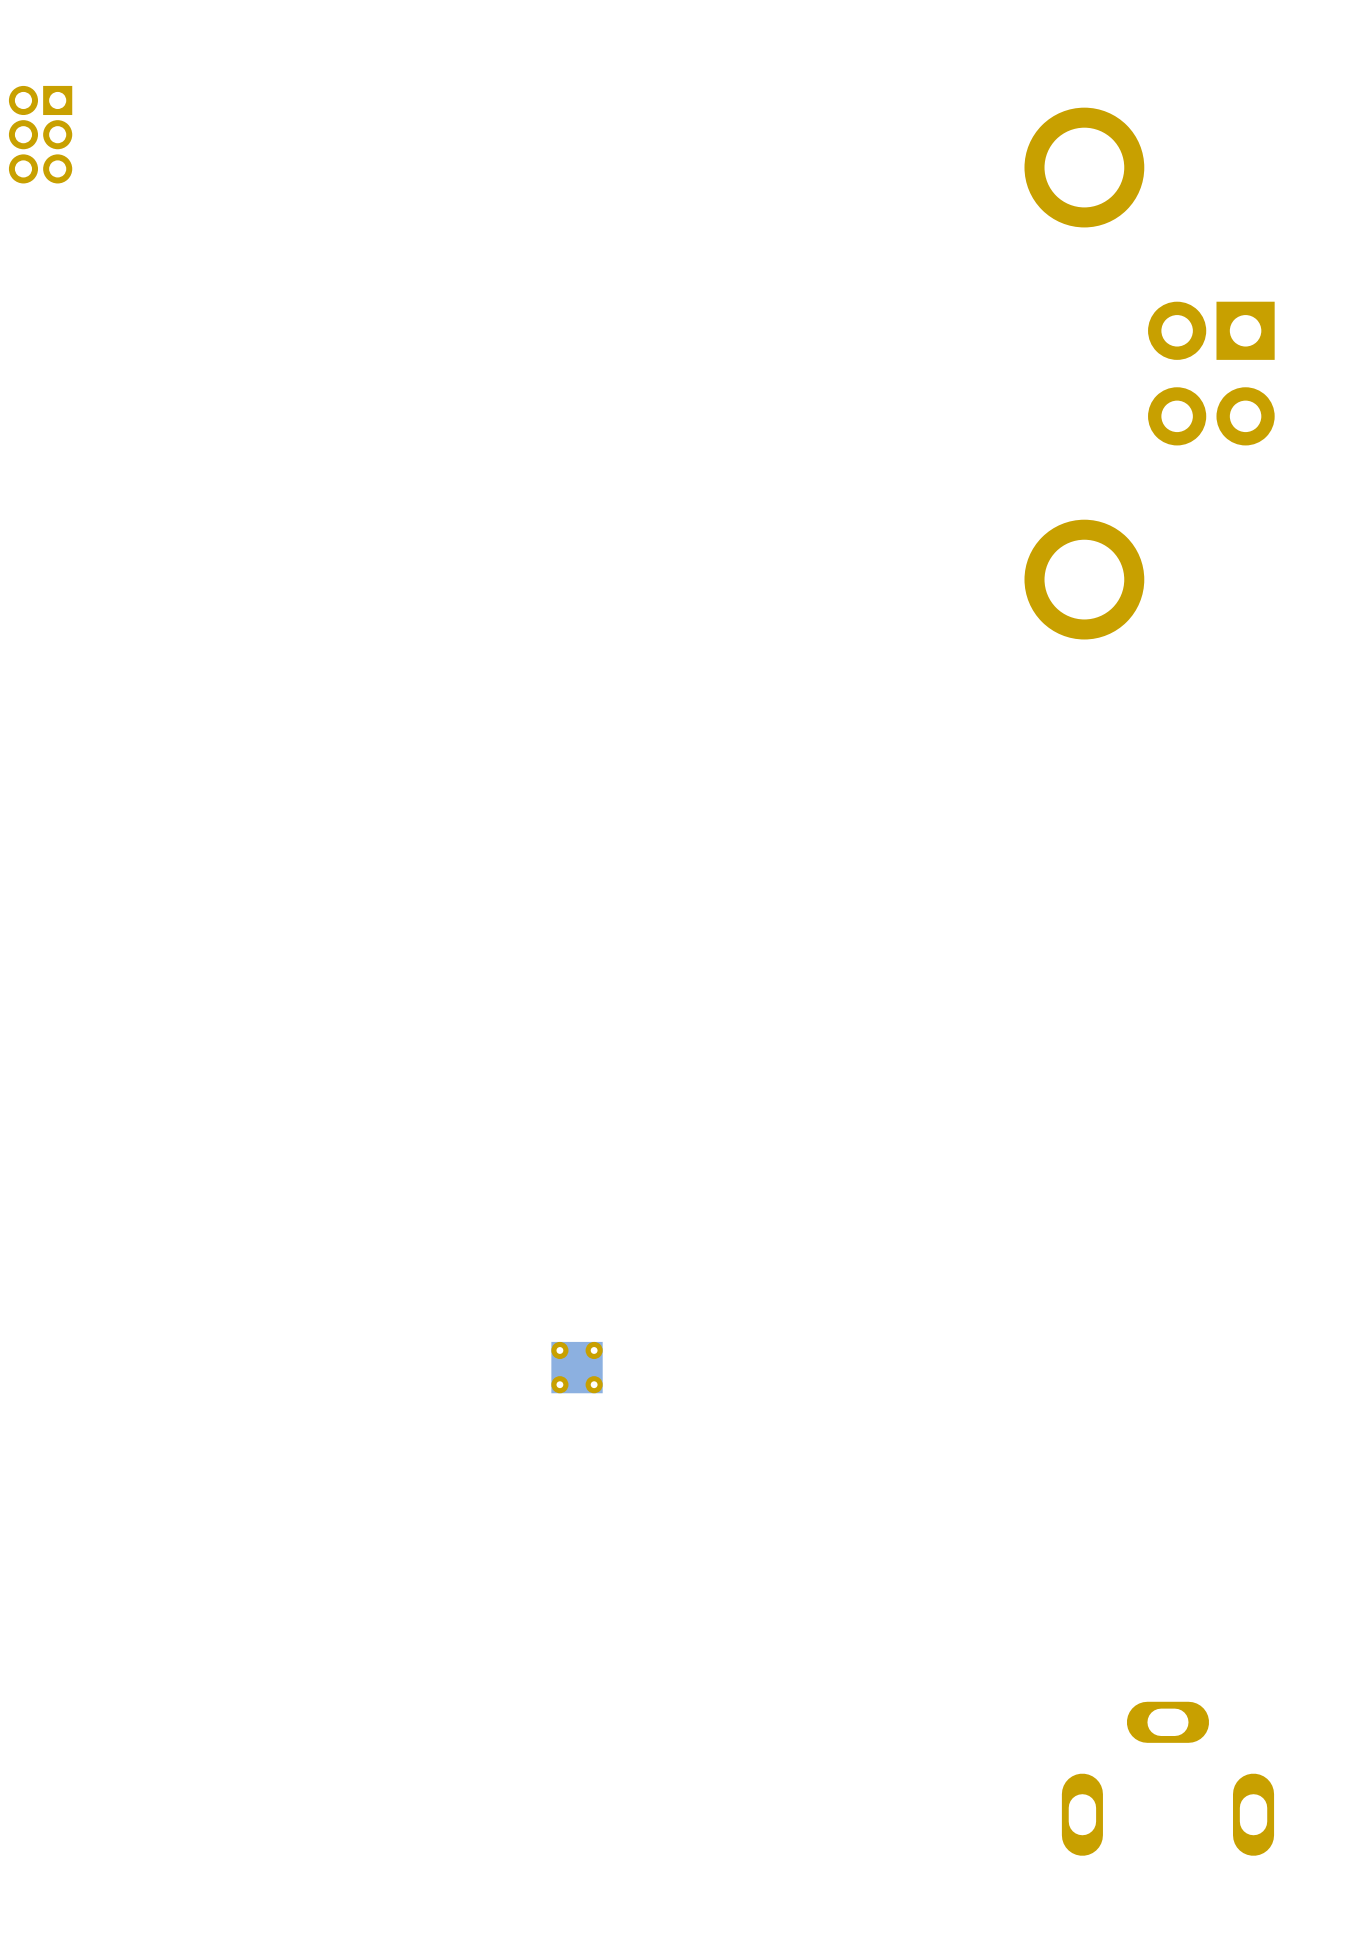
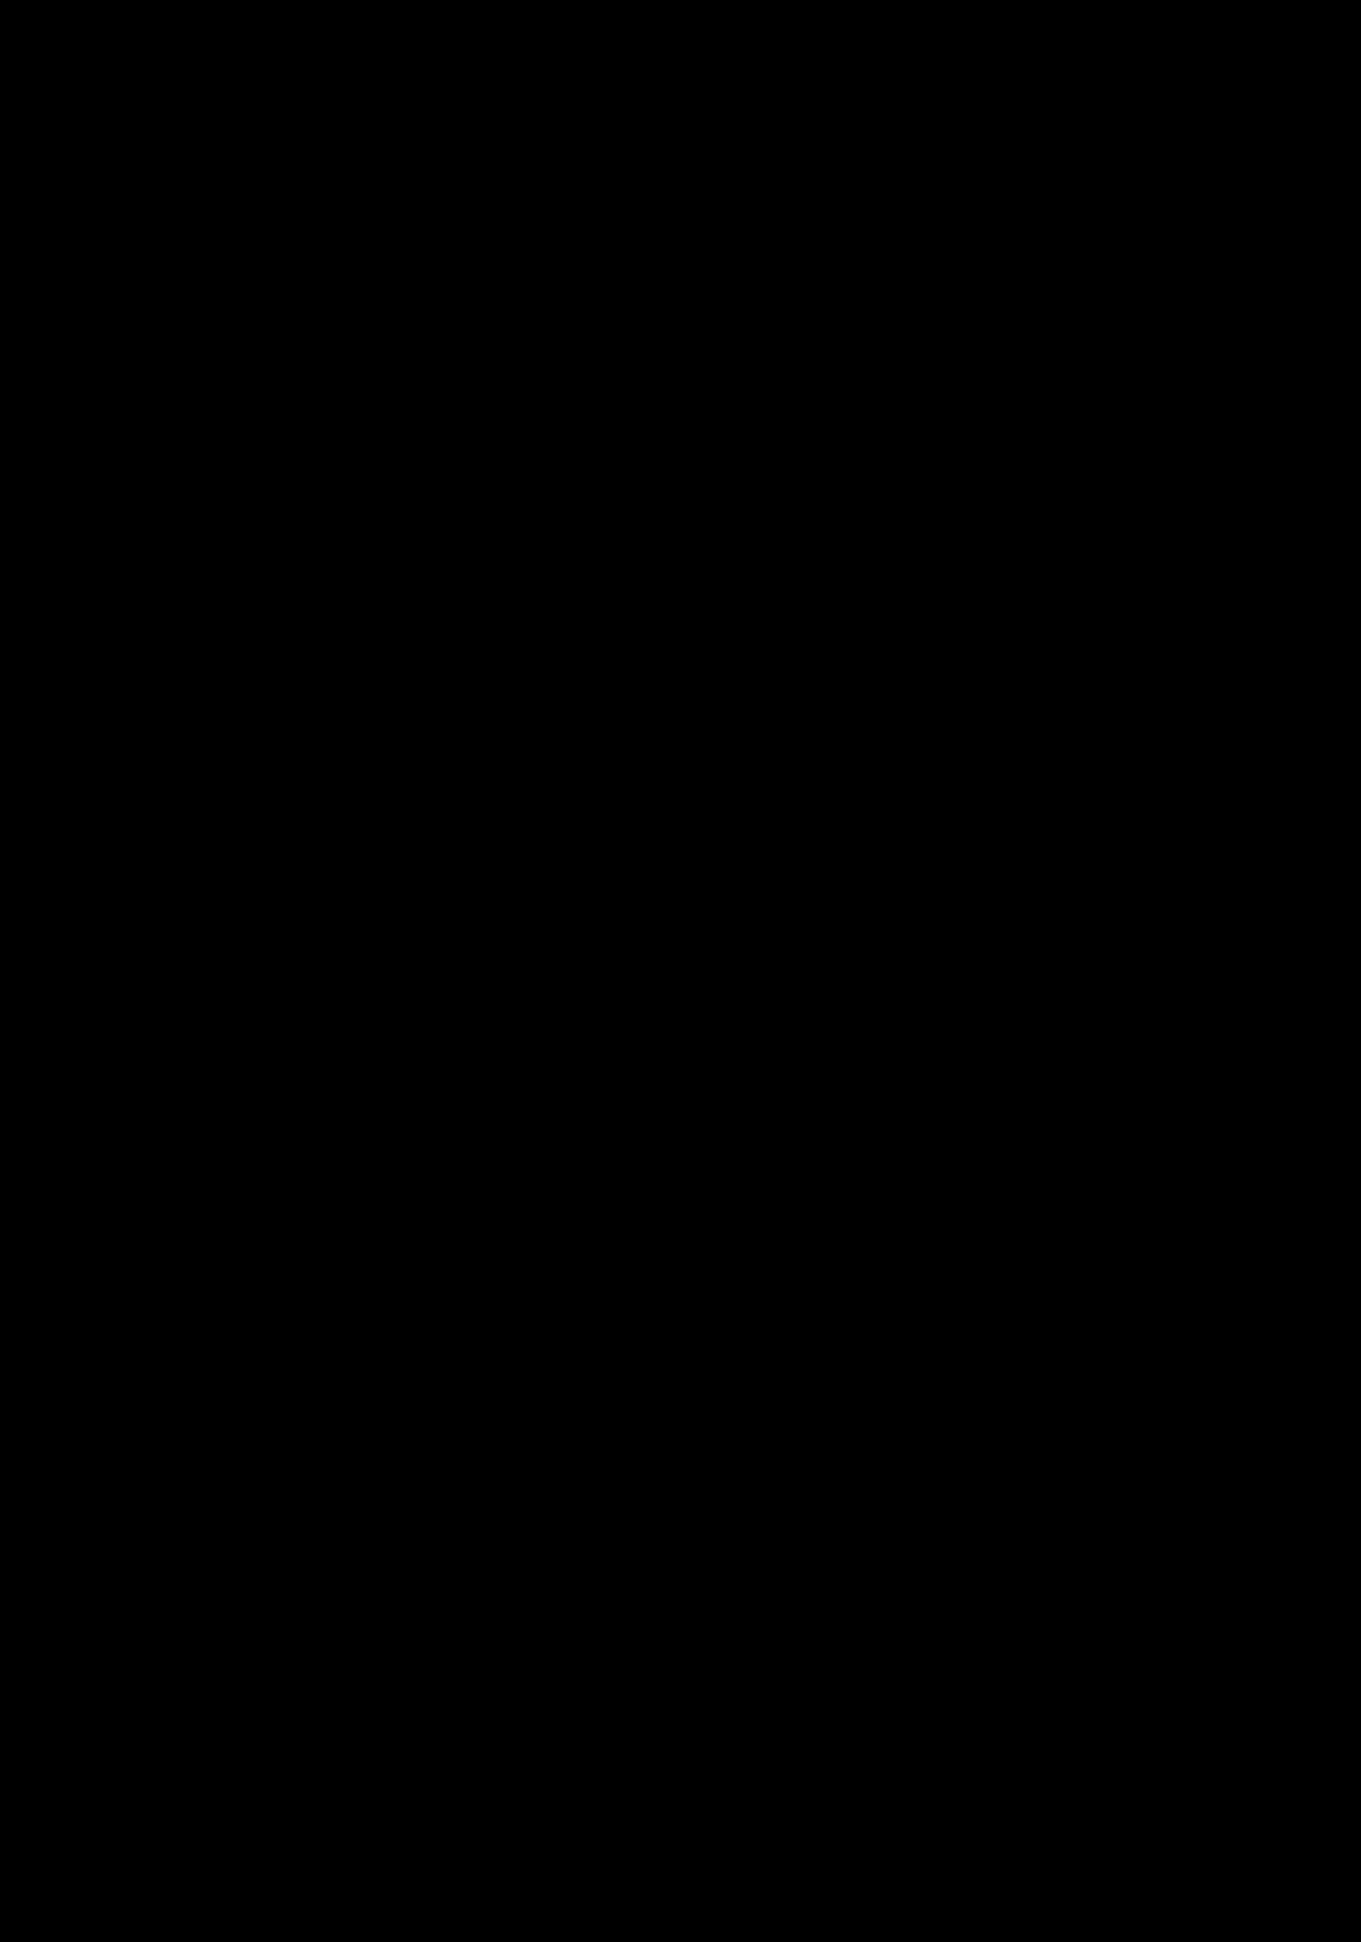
part: (40, 134) -> none
part: (1149, 373) -> none
part: (577, 1367) -> none
part: (1167, 1778) -> none

